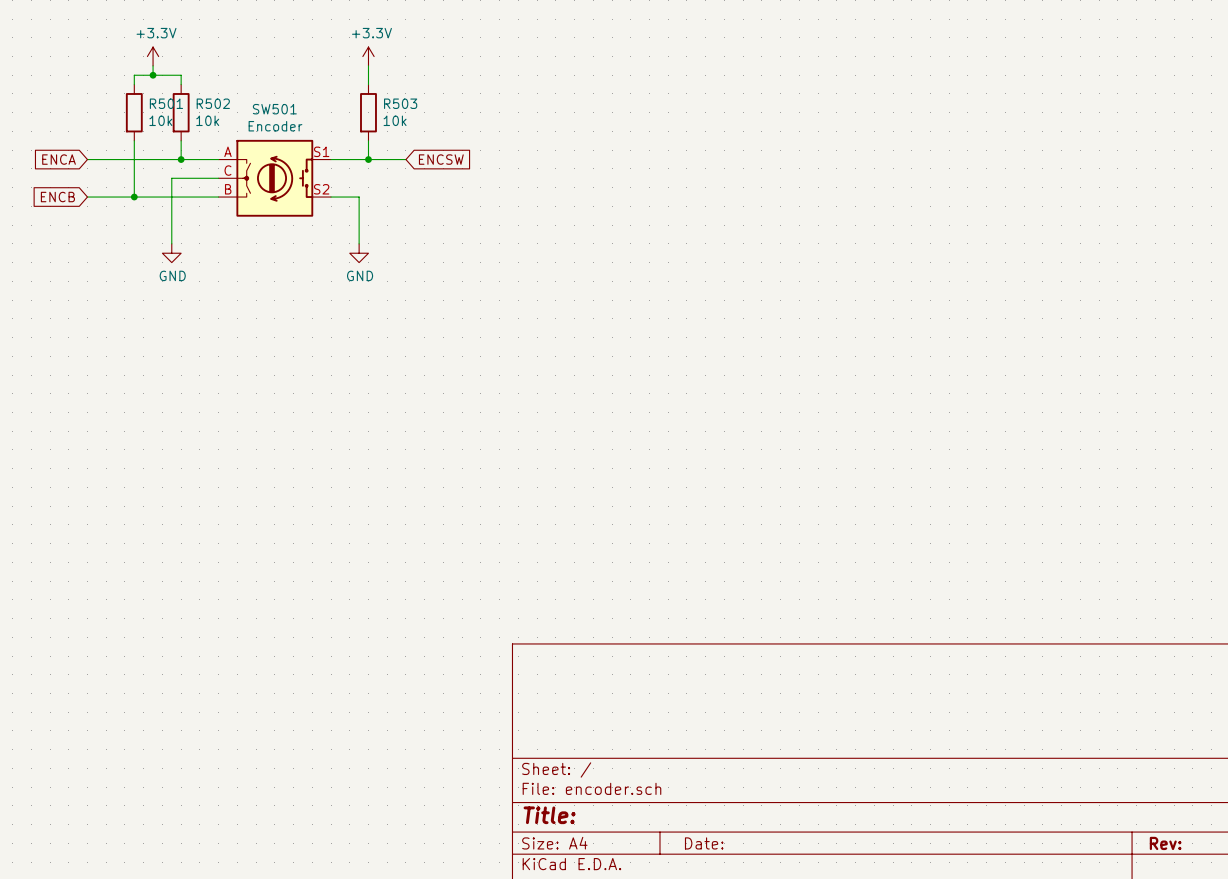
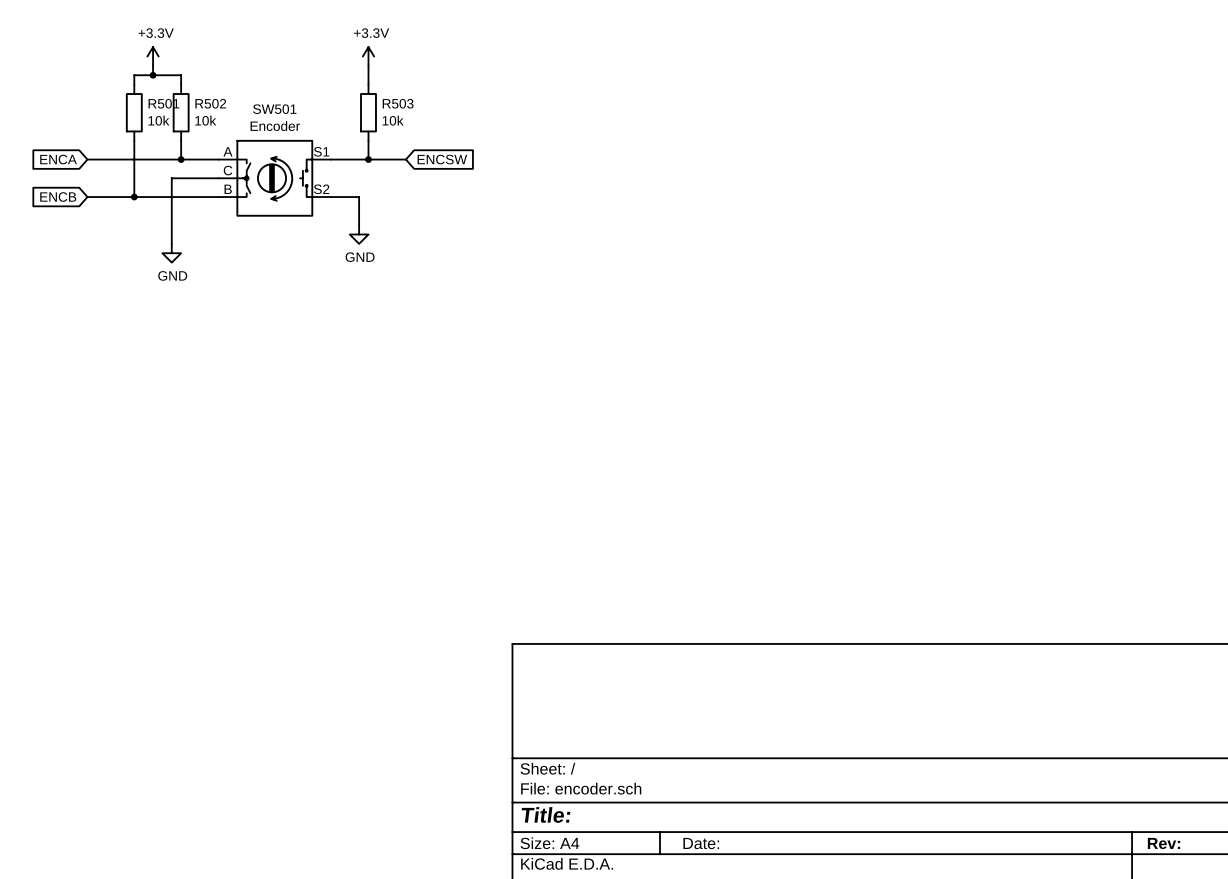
power symbol position: GND (359, 253) -> GND (359, 234)

